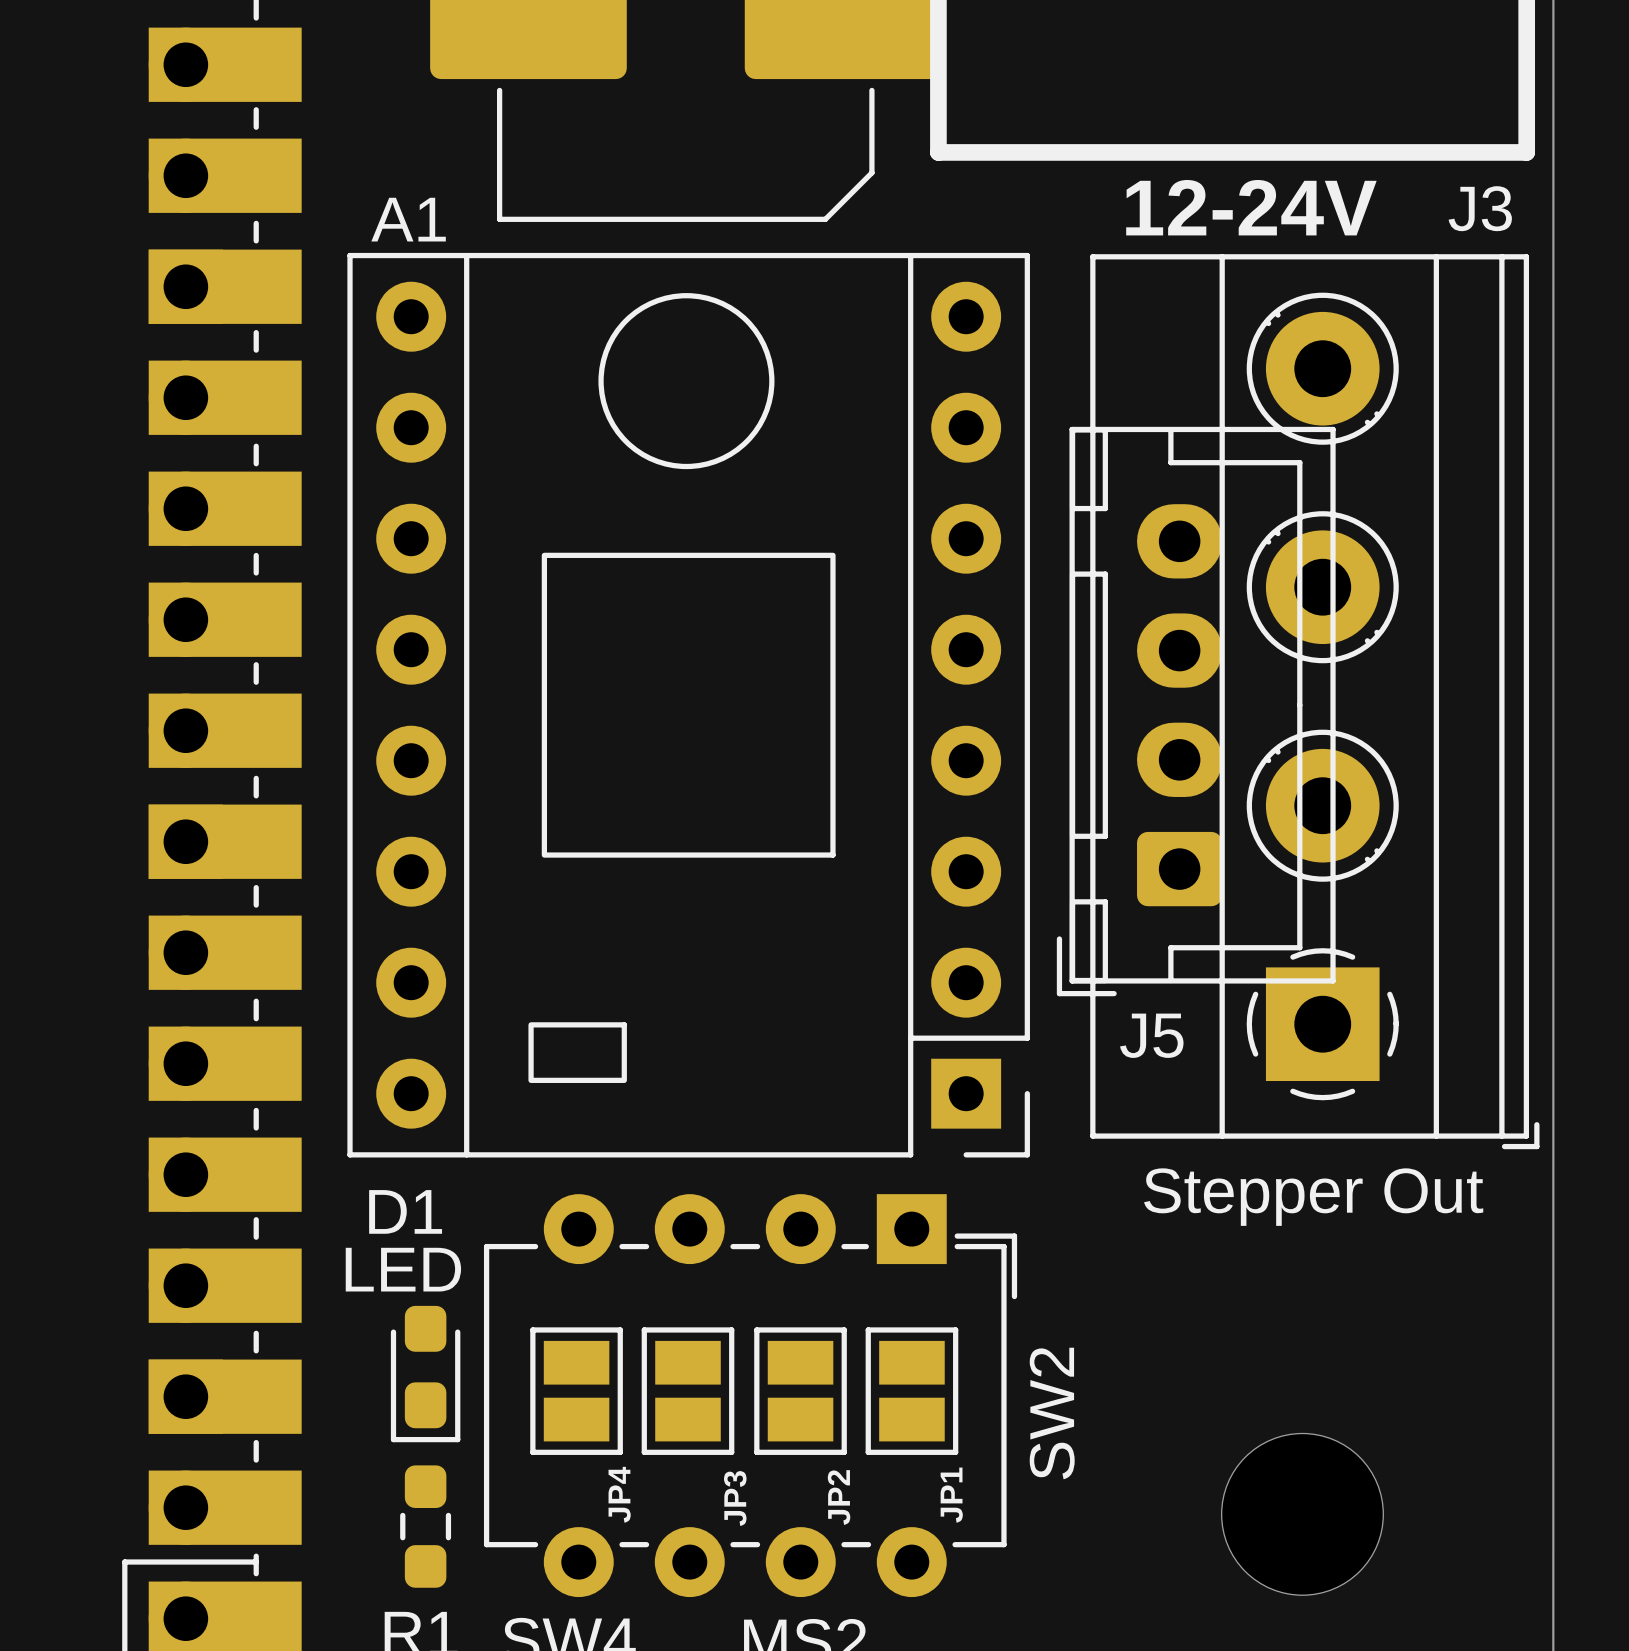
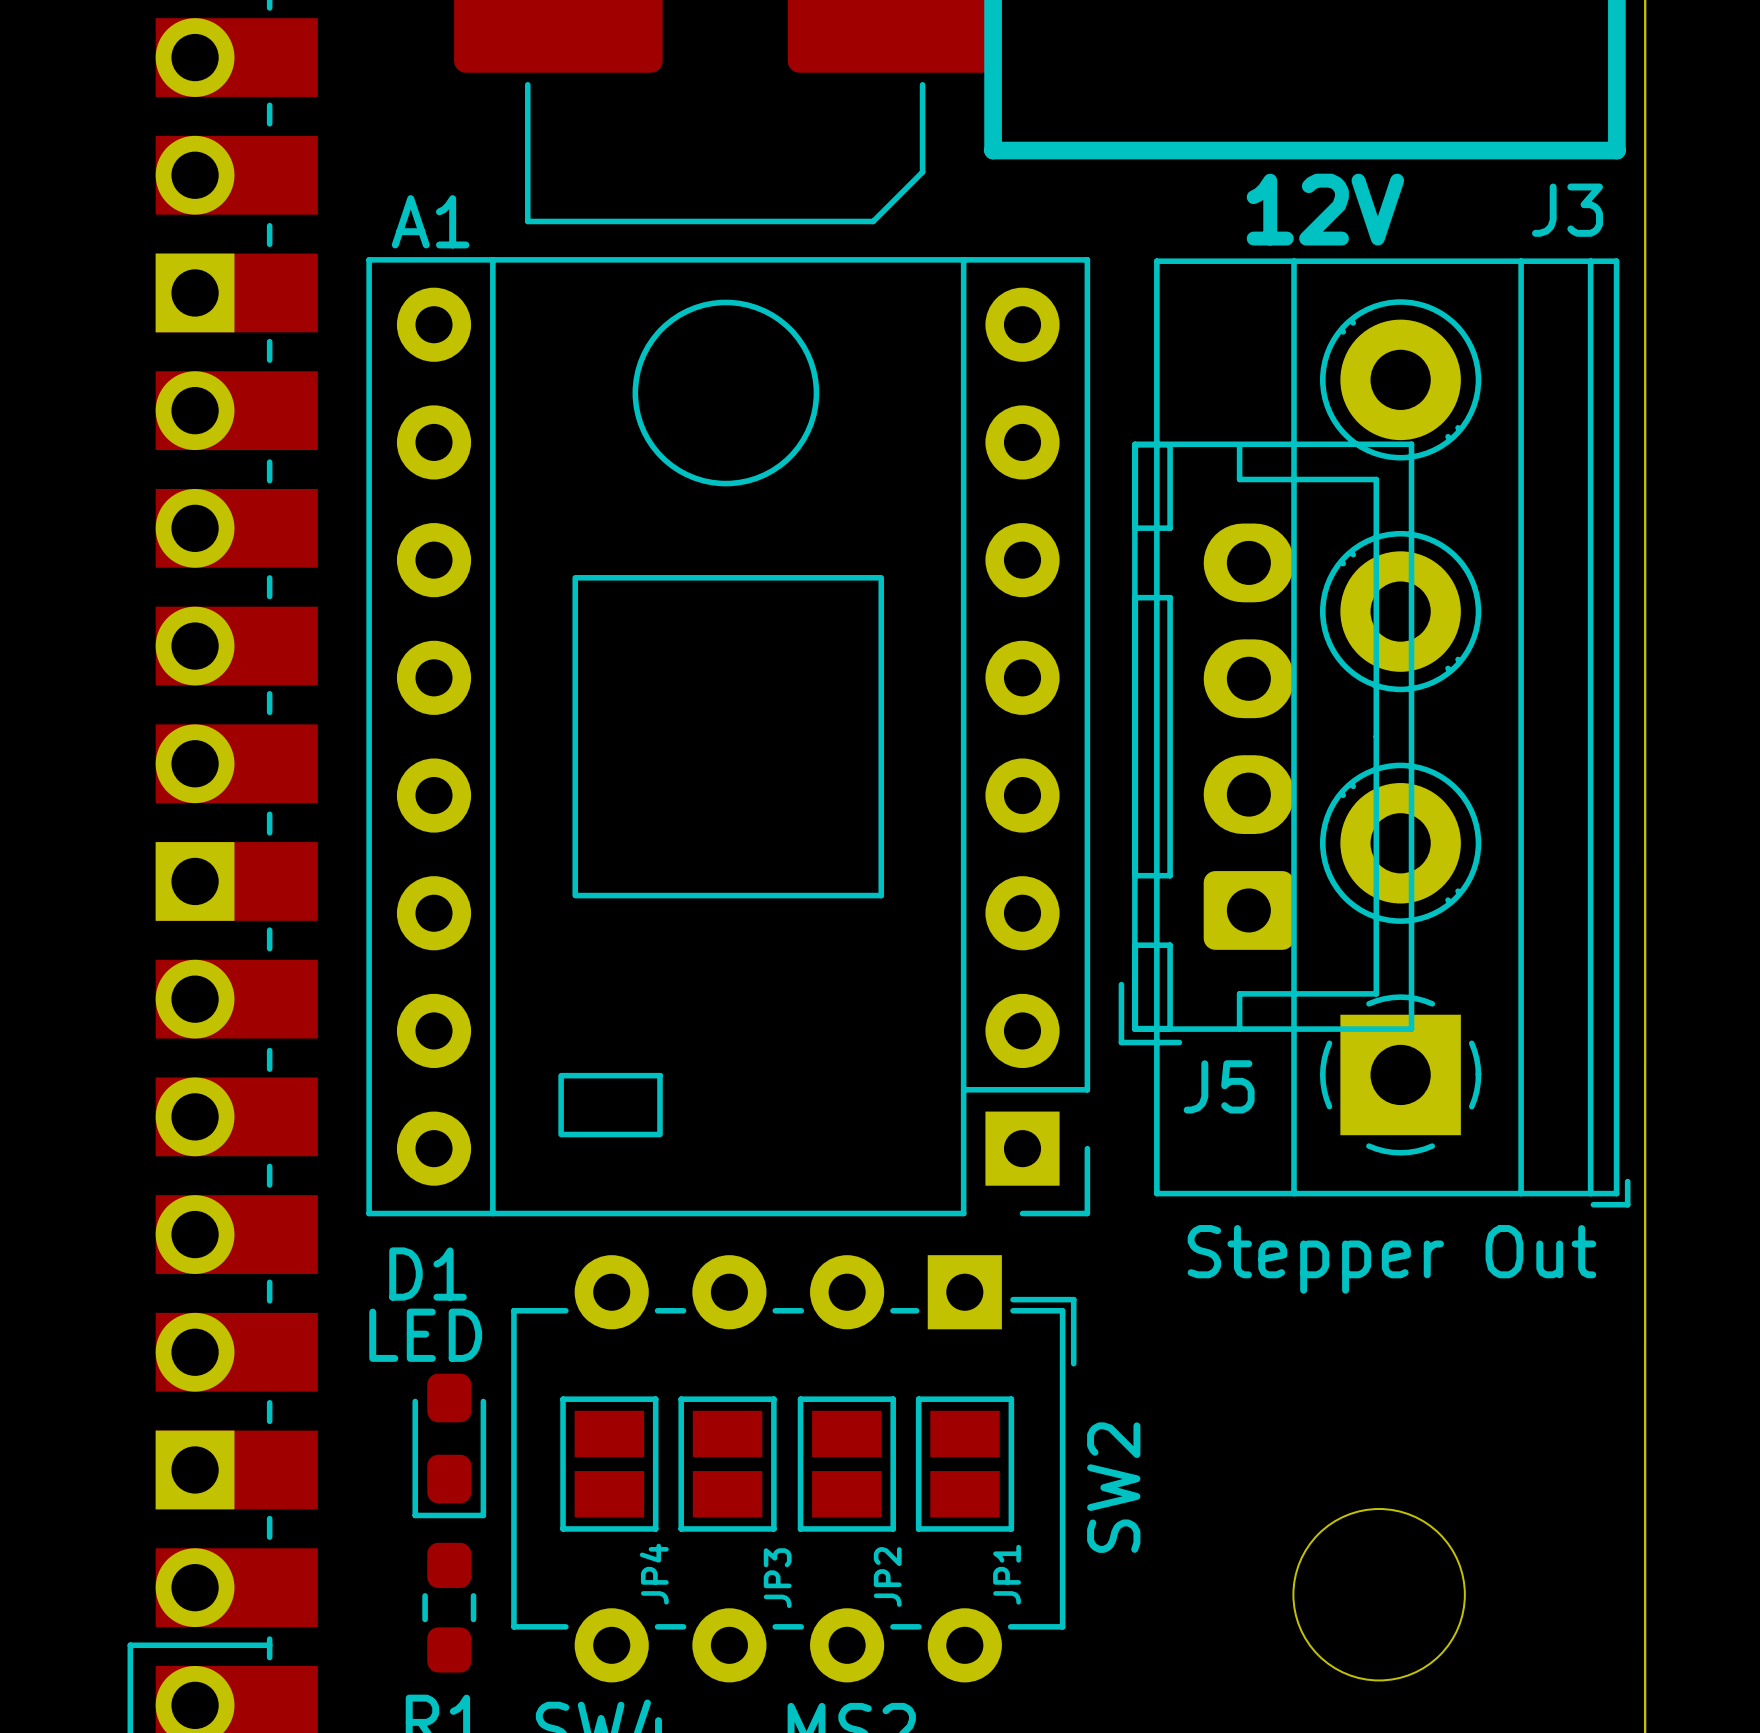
text: 12-24V (1251, 207) -> 12V (1325, 209)

